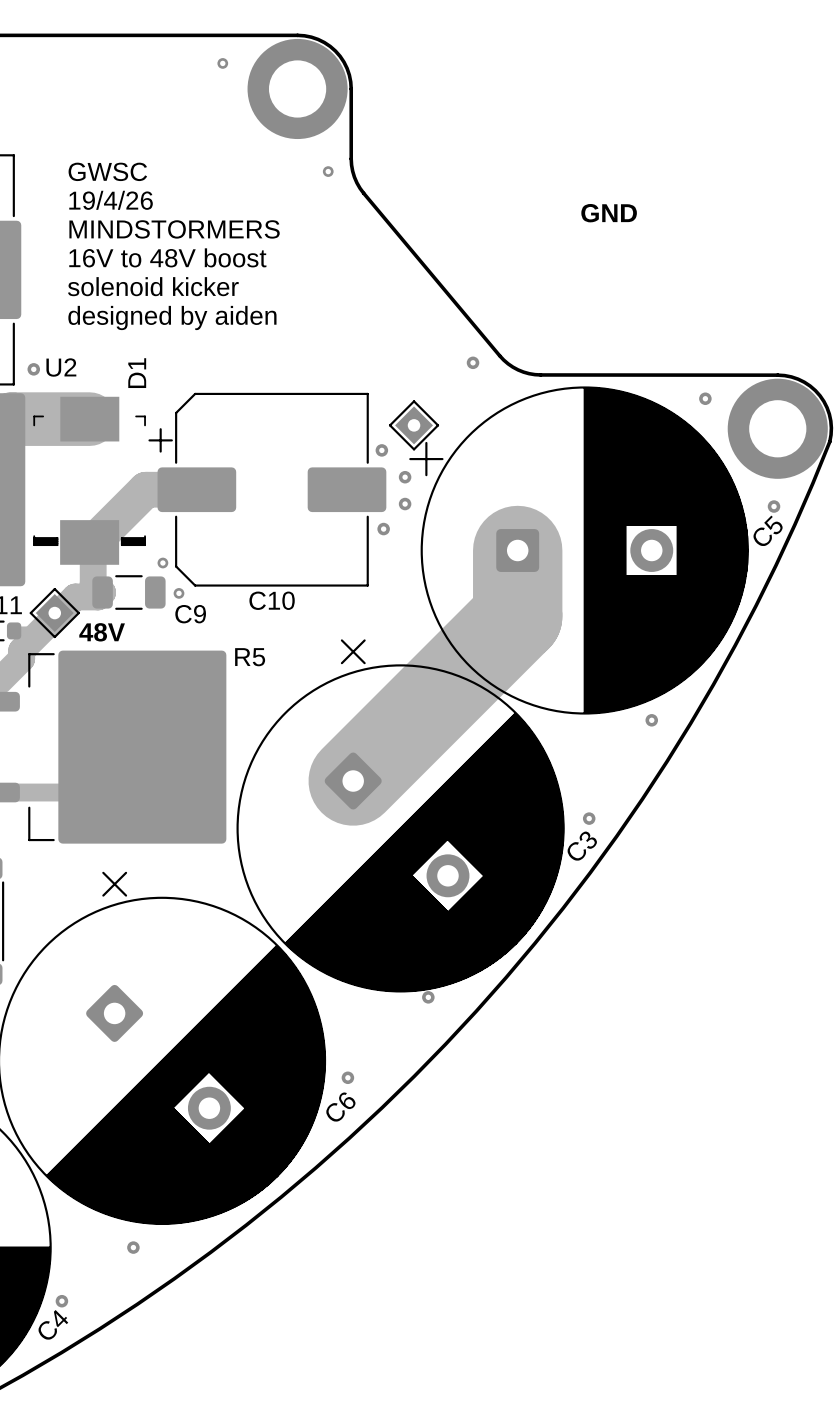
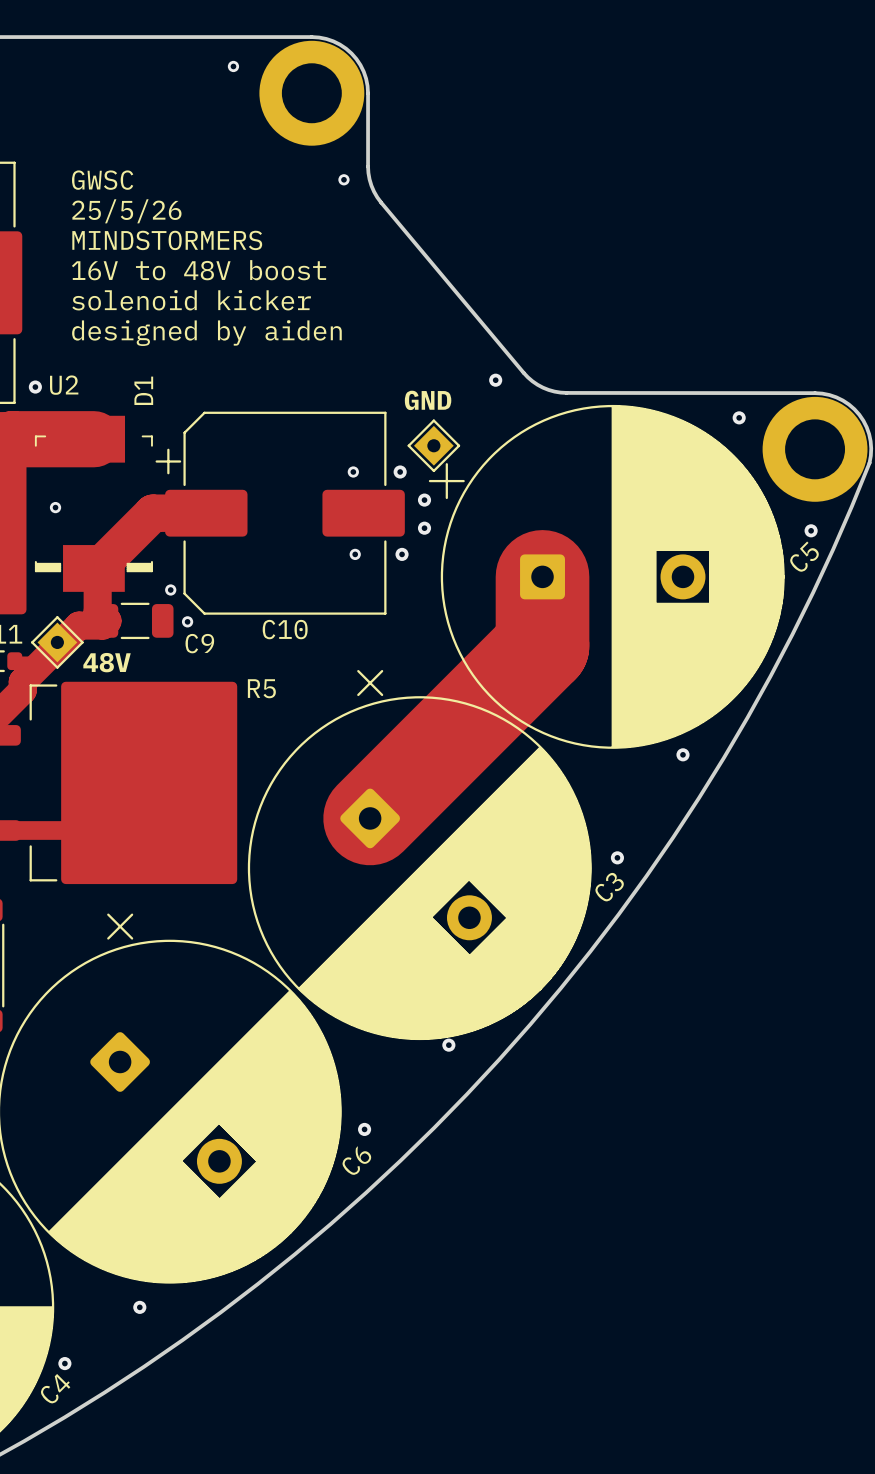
text: 19/4/26 (111, 200) -> 25/5/26 (126, 211)
text position: GND (609, 213) -> GND (428, 400)
via: none -> (353, 471)
via: none -> (55, 507)
via: none -> (355, 554)

